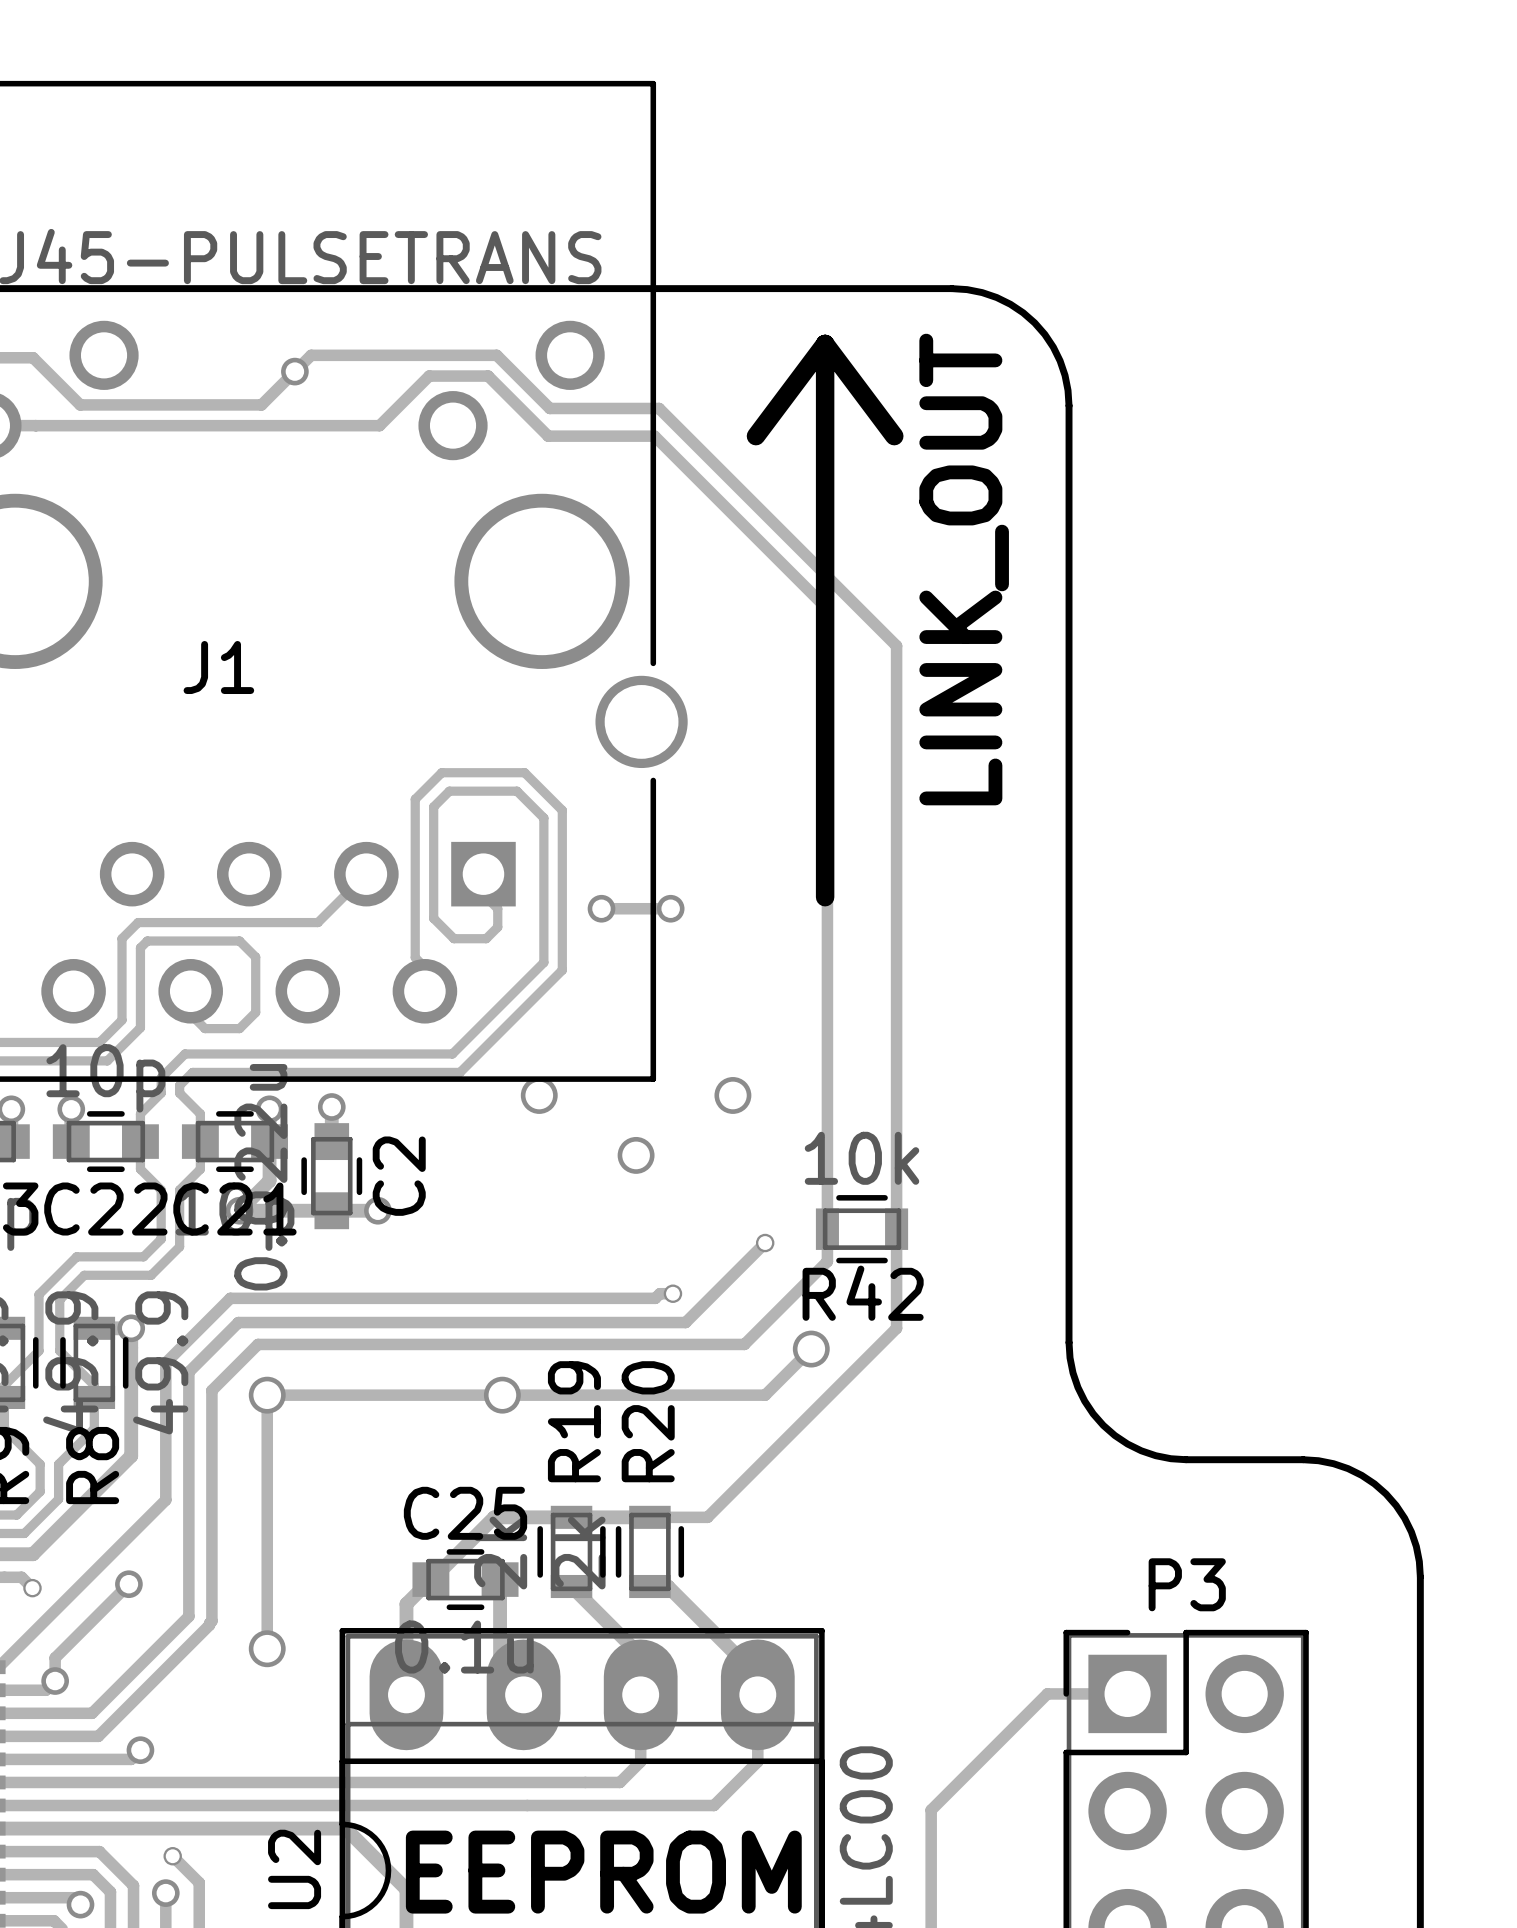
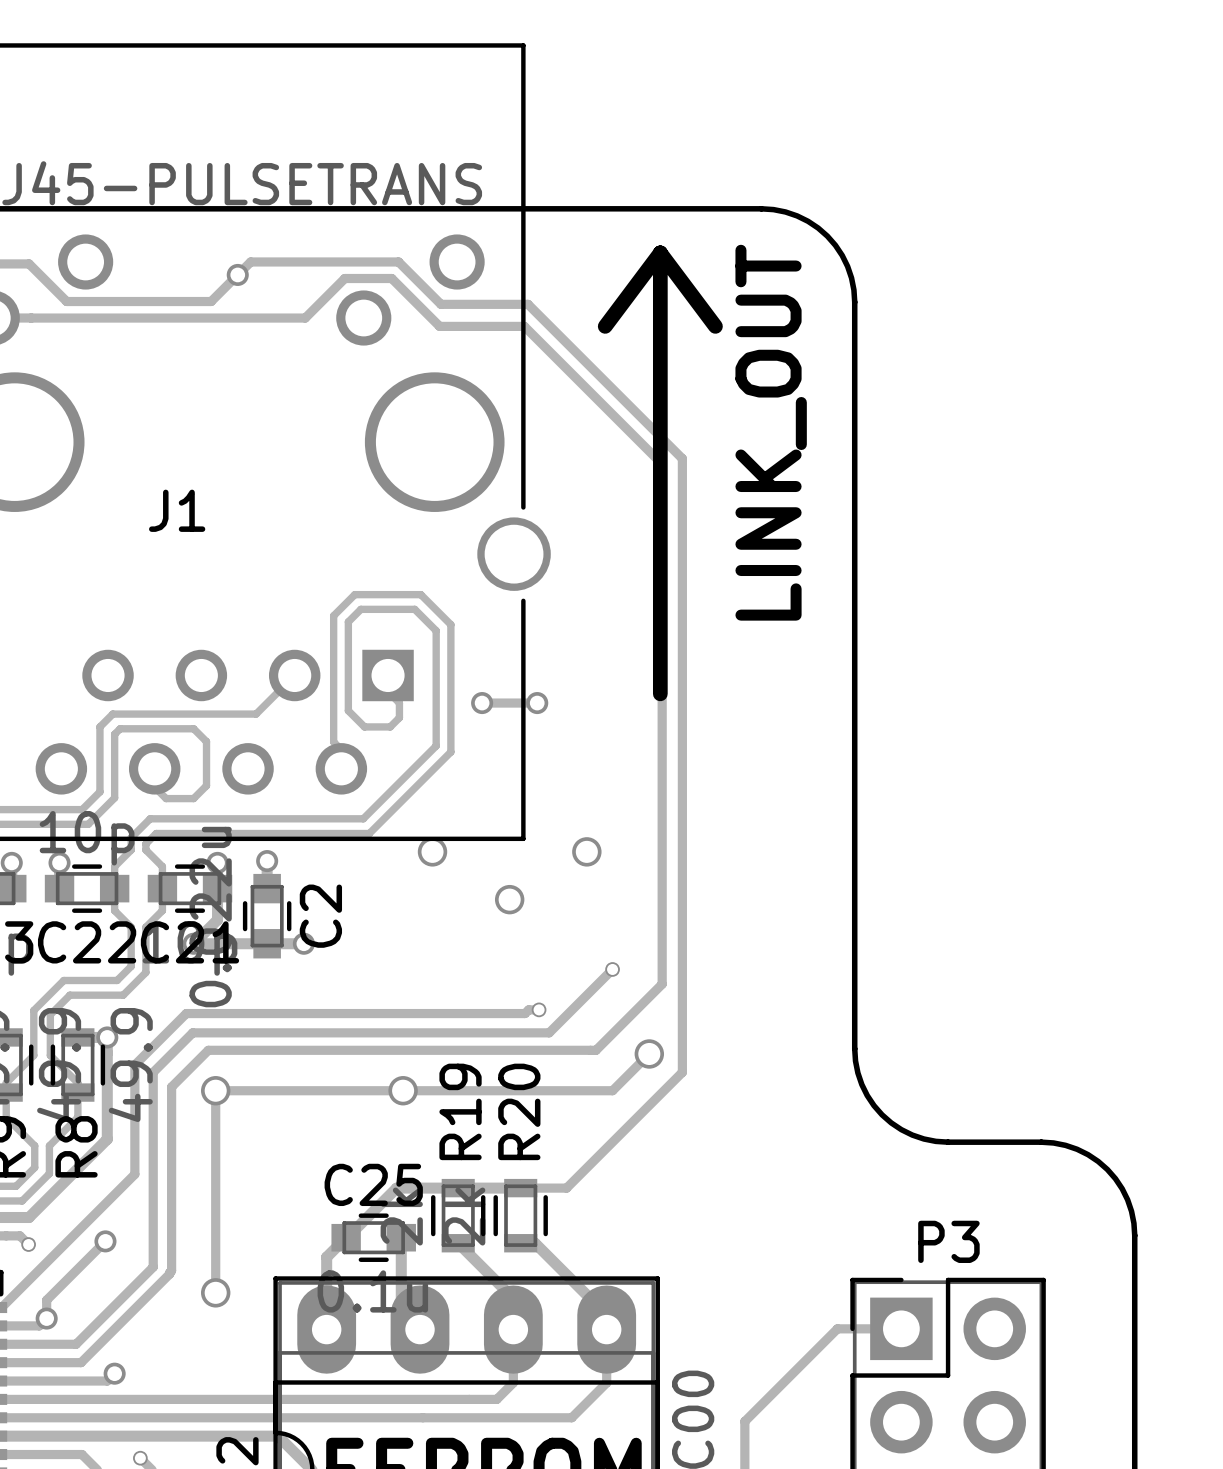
track: (852, 602) (896, 645) (896, 1328) (852, 1372) -> (682, 458) (682, 1072)
R42: 10k (862, 1229) -> none

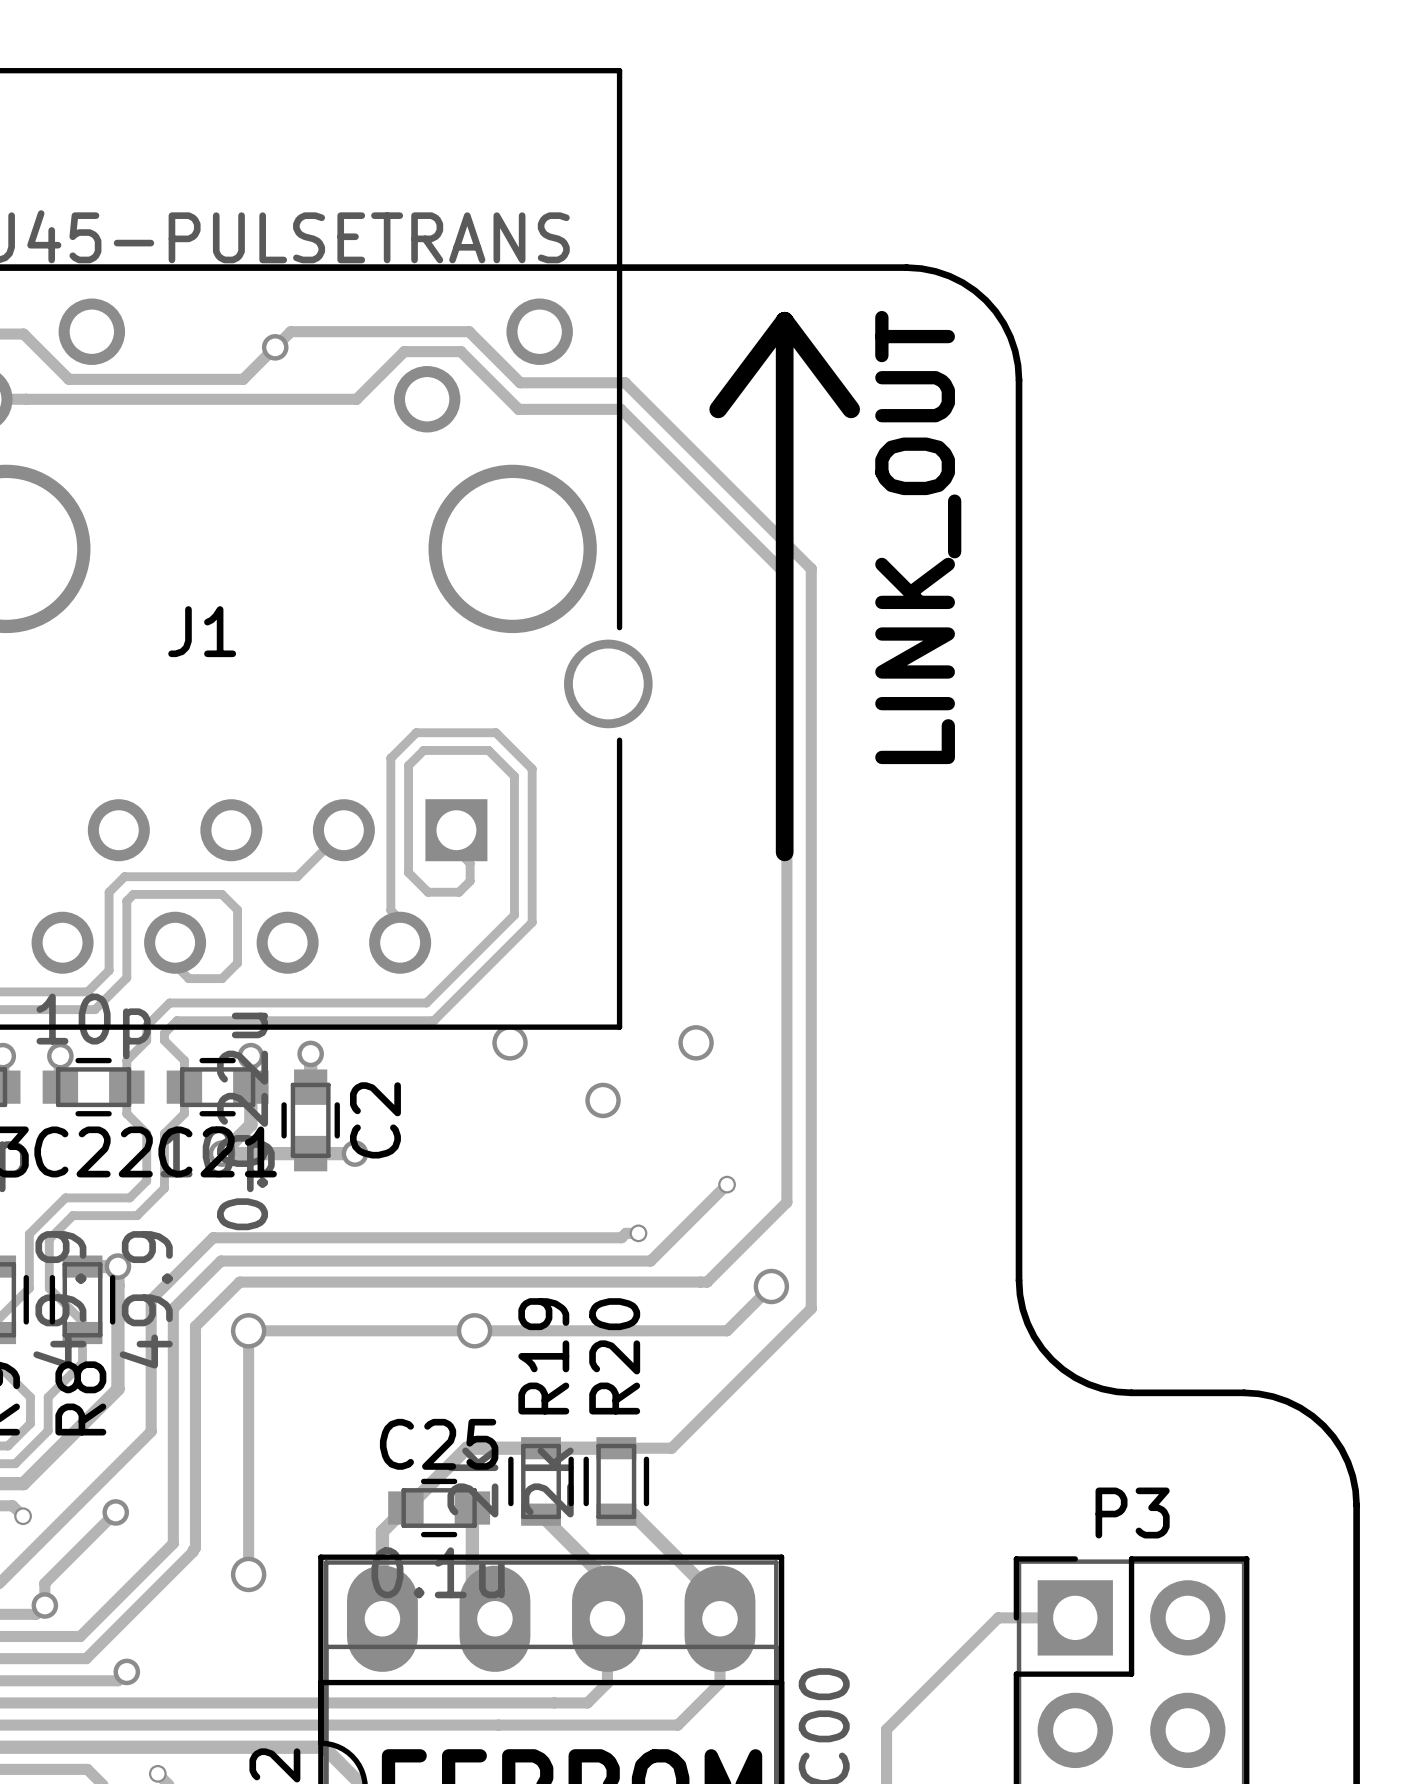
track: (482, 703) (537, 703) -> none
via: (482, 703) -> none
via: (537, 703) -> none

